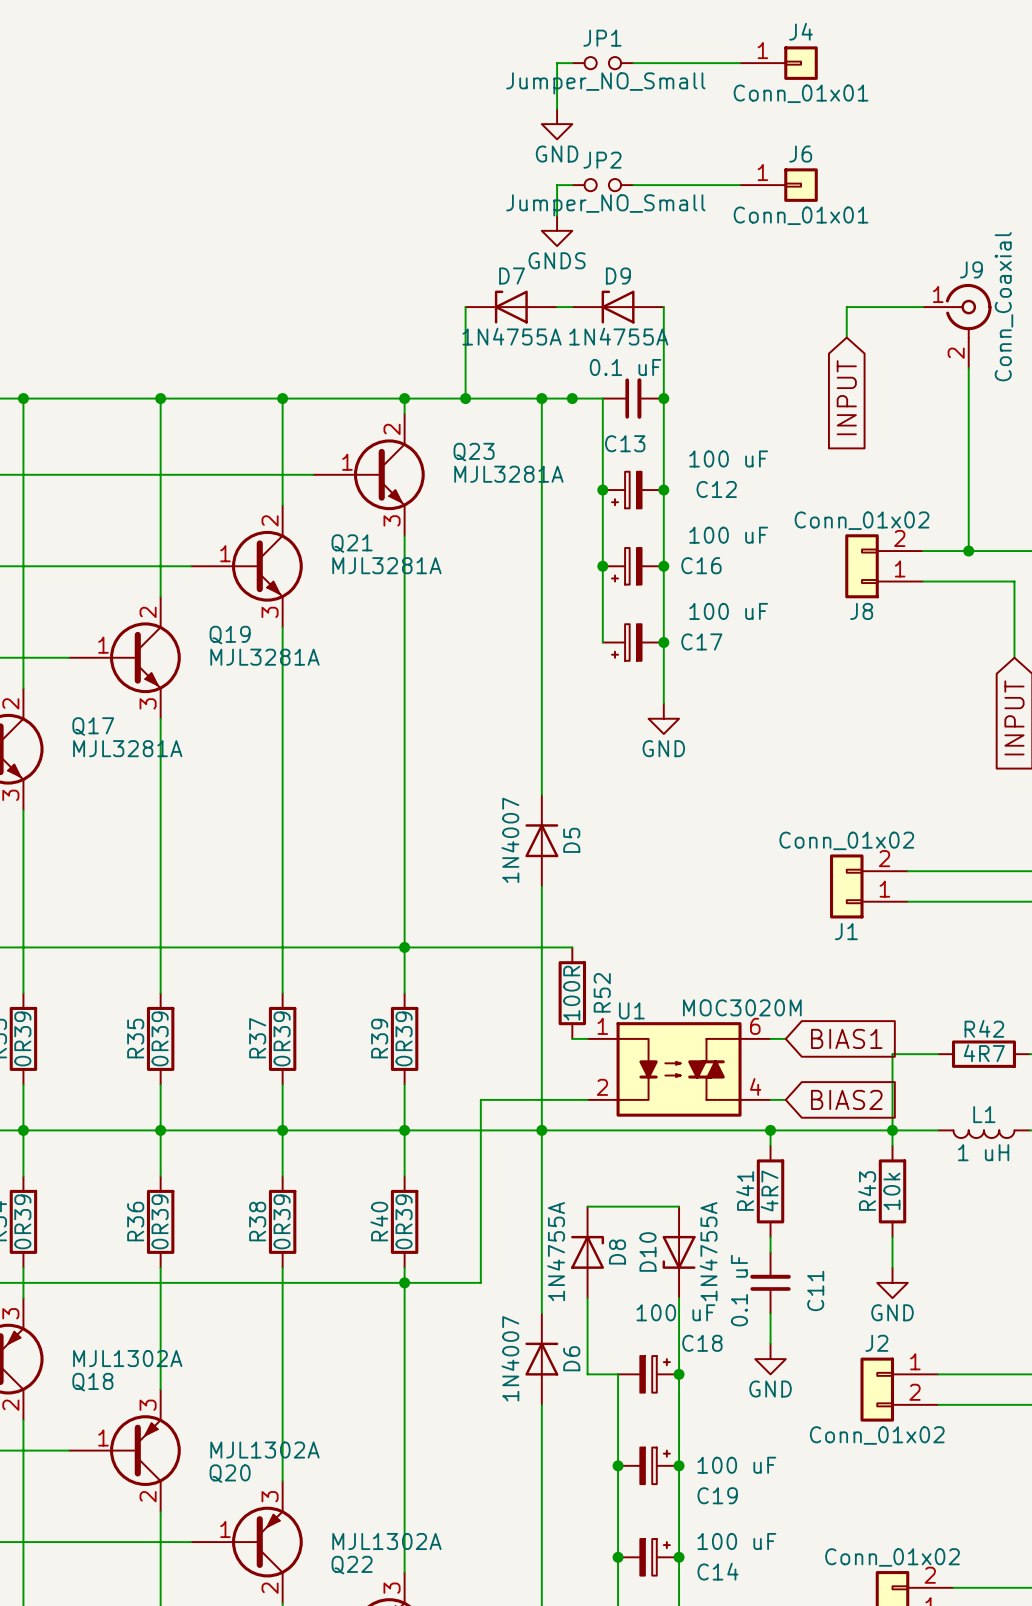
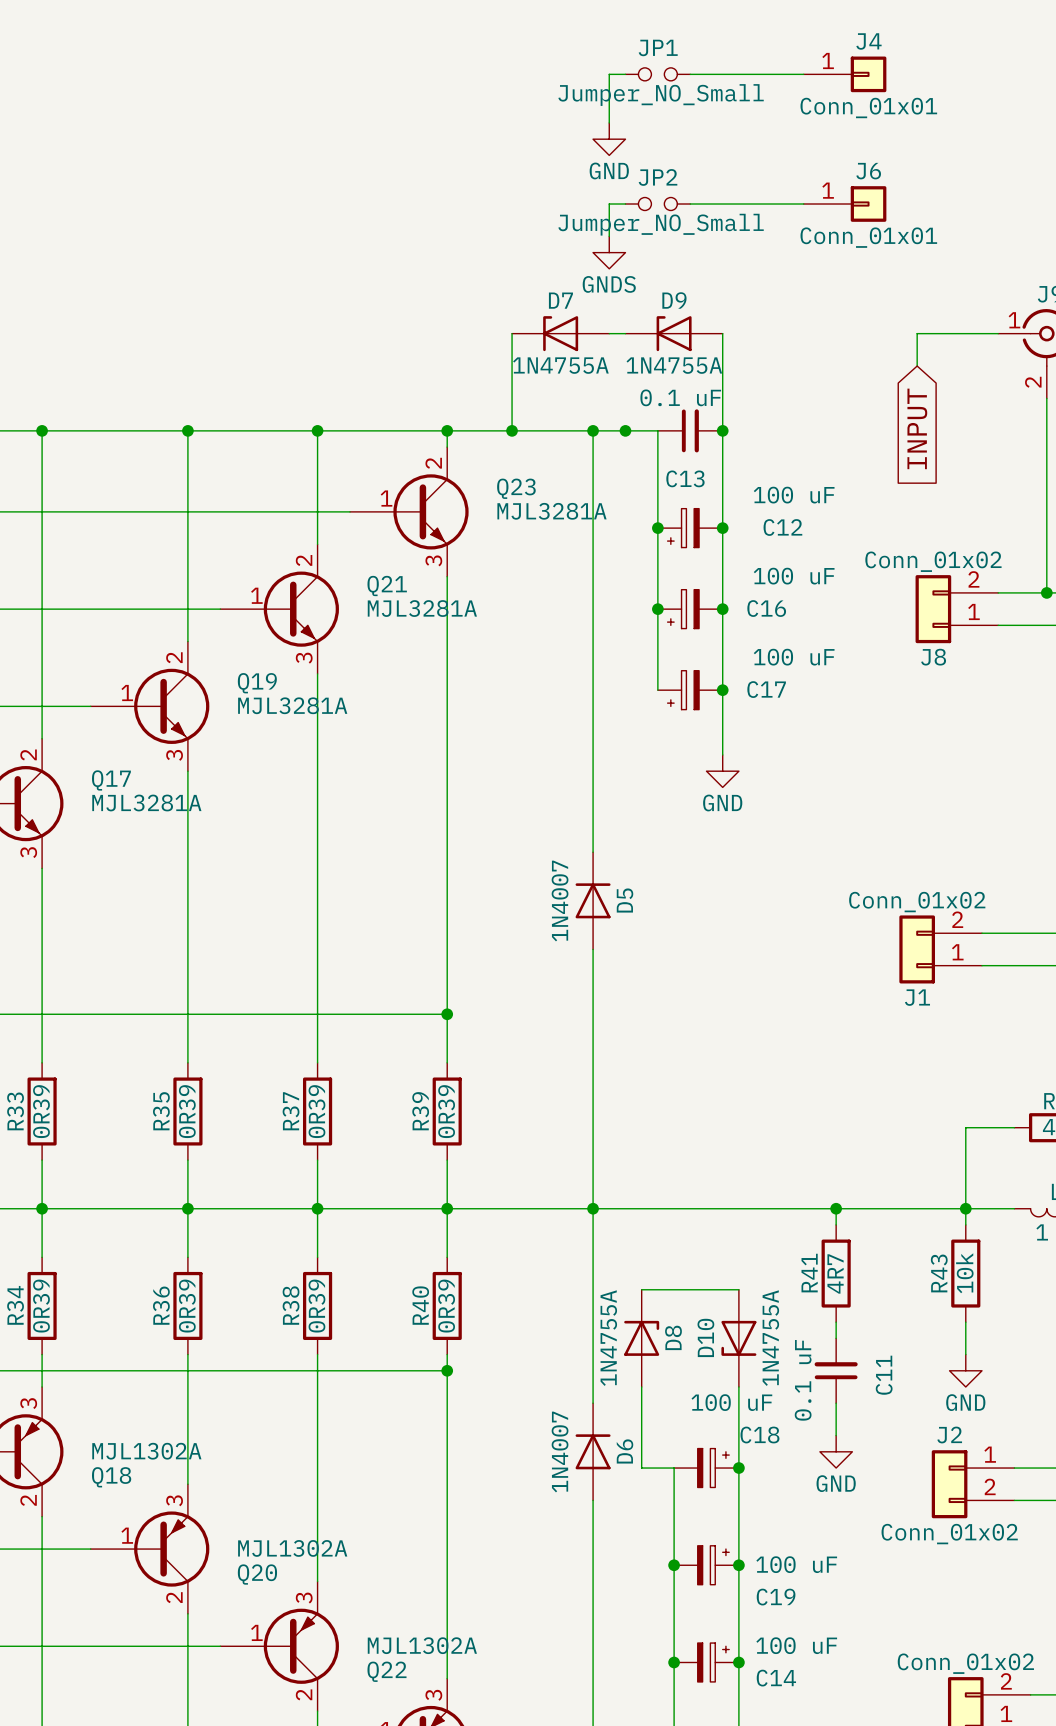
wire: (404, 947) (572, 947) -> none
R52: 100R (572, 993) -> none
wire: (572, 1038) (587, 1038) -> none
wire: (770, 1038) (785, 1038) -> none
global label: BIAS1 (846, 1038) -> none
U1: MOC3020M (679, 1069) -> none
wire: (587, 1099) (480, 1099) (480, 1282) (404, 1282) -> none
wire: (770, 1099) (785, 1099) -> none
global label: BIAS2 (846, 1099) -> none

